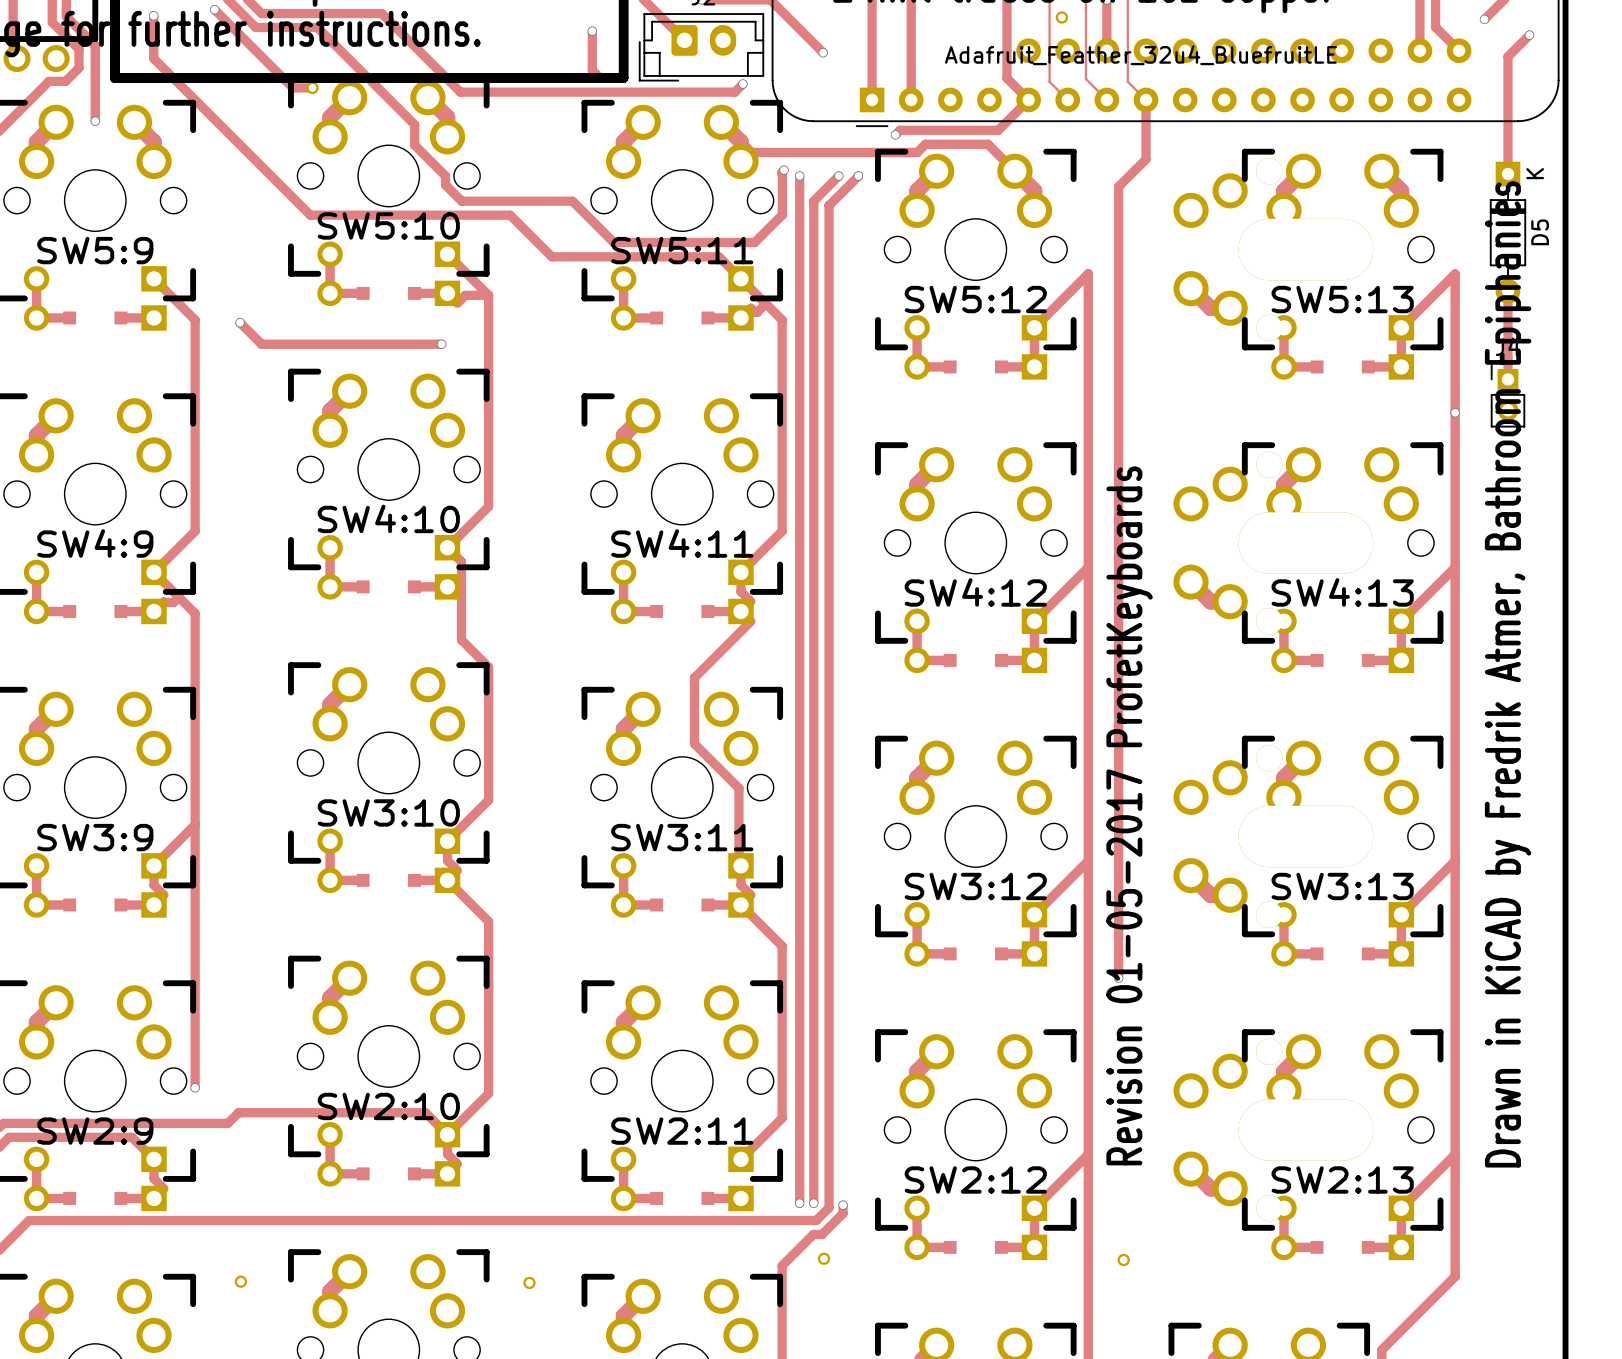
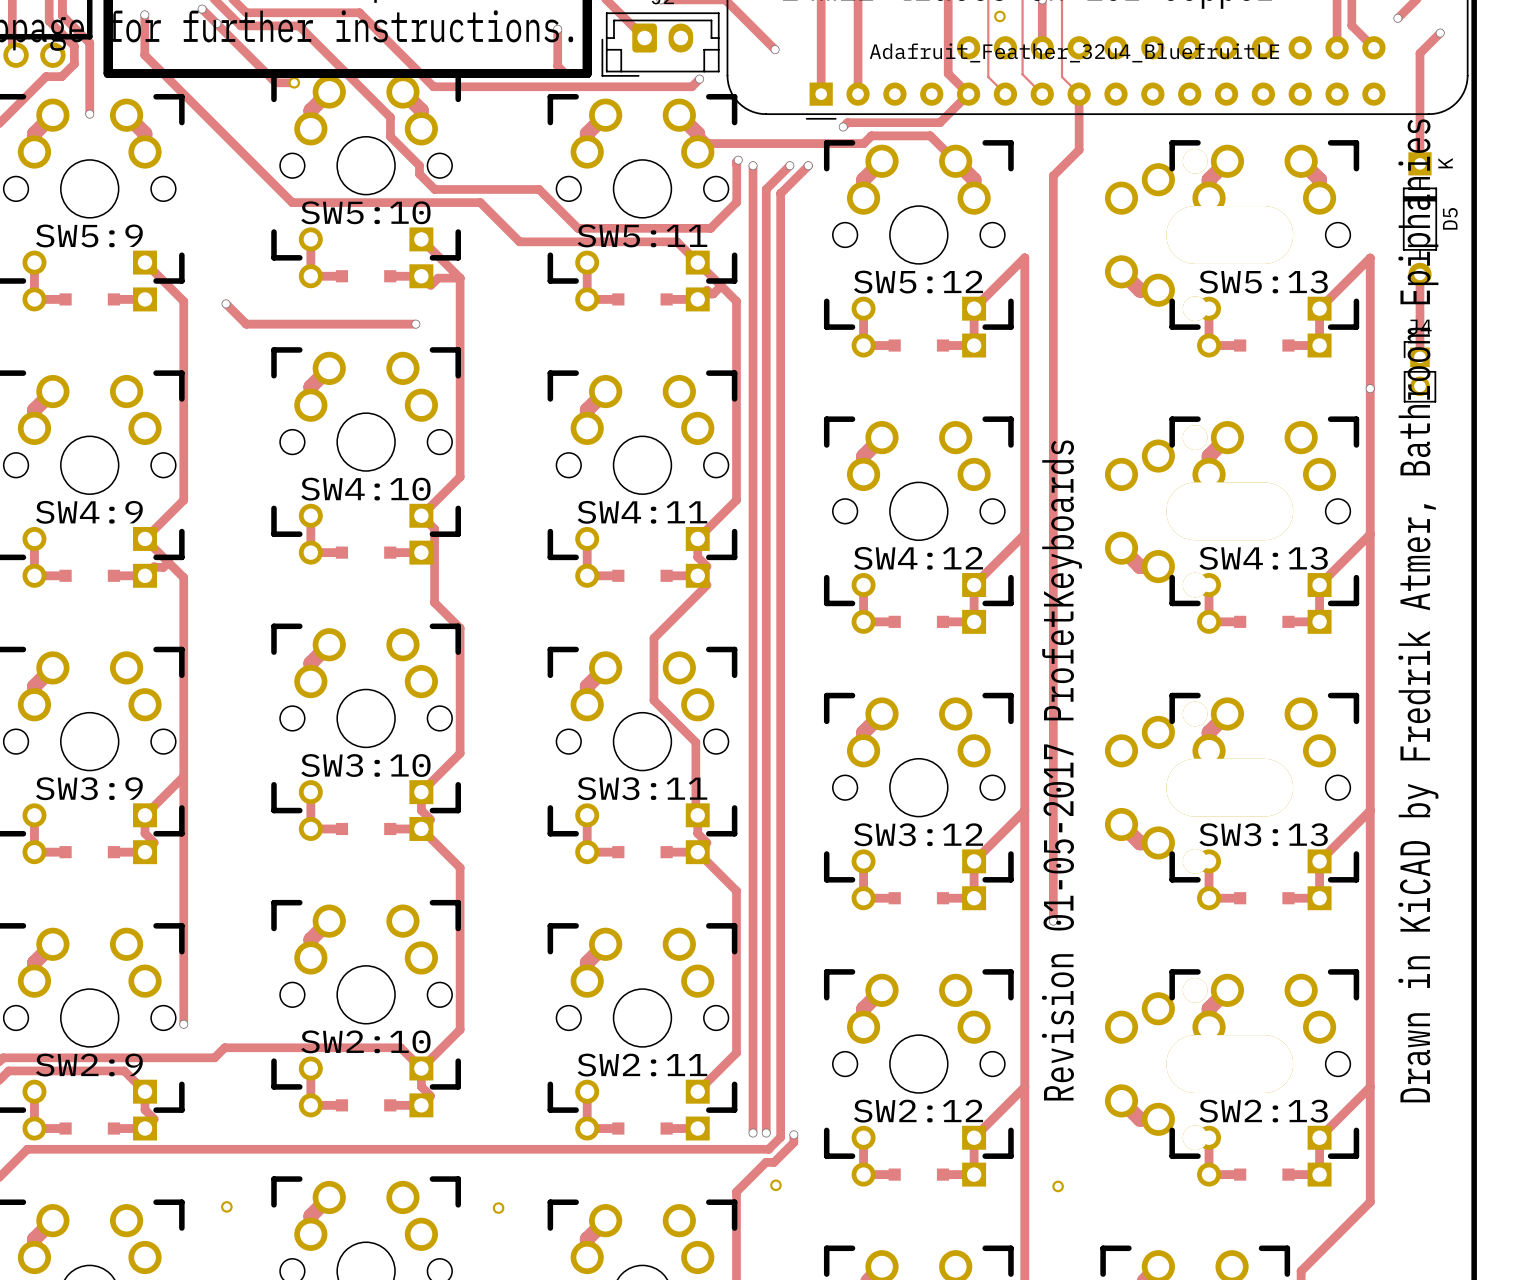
via: none -> (216, 23)

